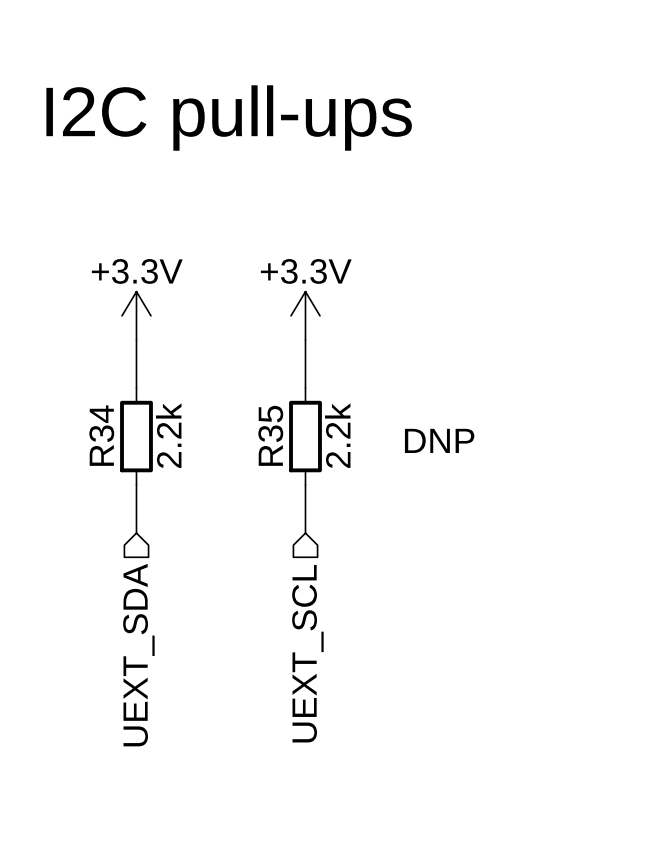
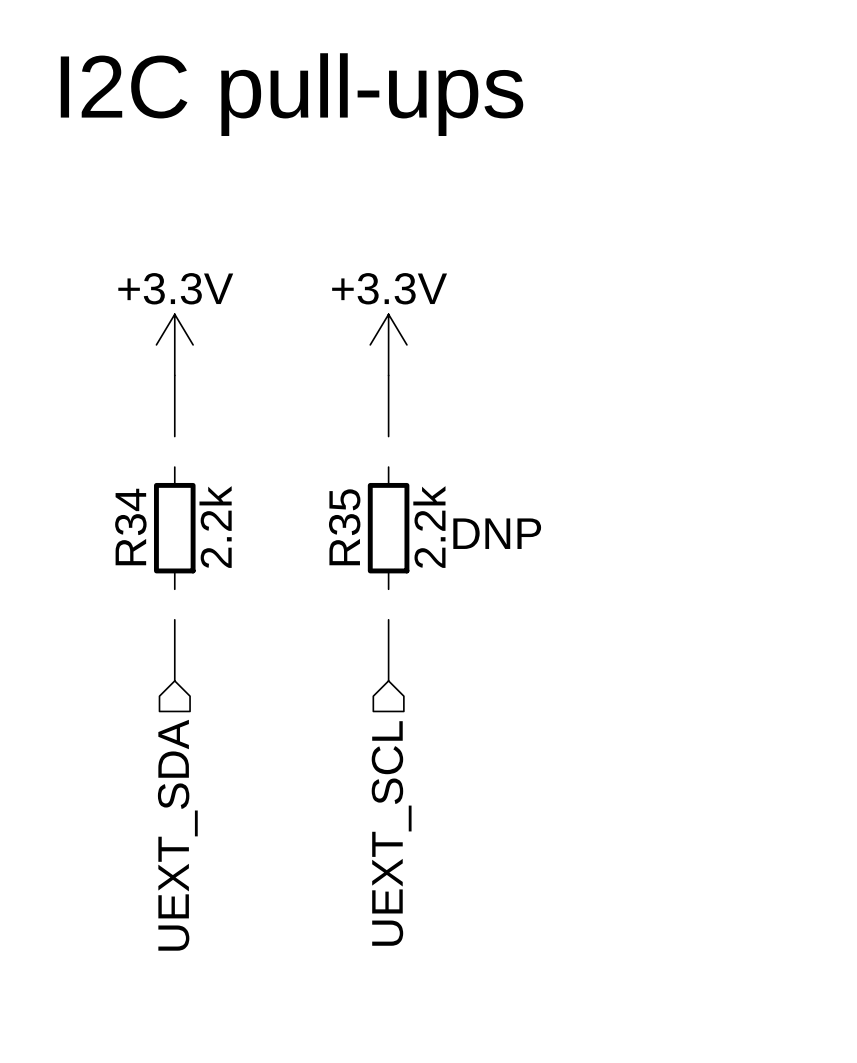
R34 position: (136, 436) -> (174, 528)
R35 position: (305, 436) -> (388, 528)
text position: DNP (439, 440) -> DNP (497, 533)
wire: (136, 484) (136, 533) -> (174, 680) (174, 619)
wire: (305, 484) (305, 533) -> (388, 680) (388, 619)
hierarchical label position: UEXT_SCL (307, 653) -> UEXT_SCL (391, 833)
hierarchical label position: UEXT_SDA (138, 655) -> UEXT_SDA (177, 835)

